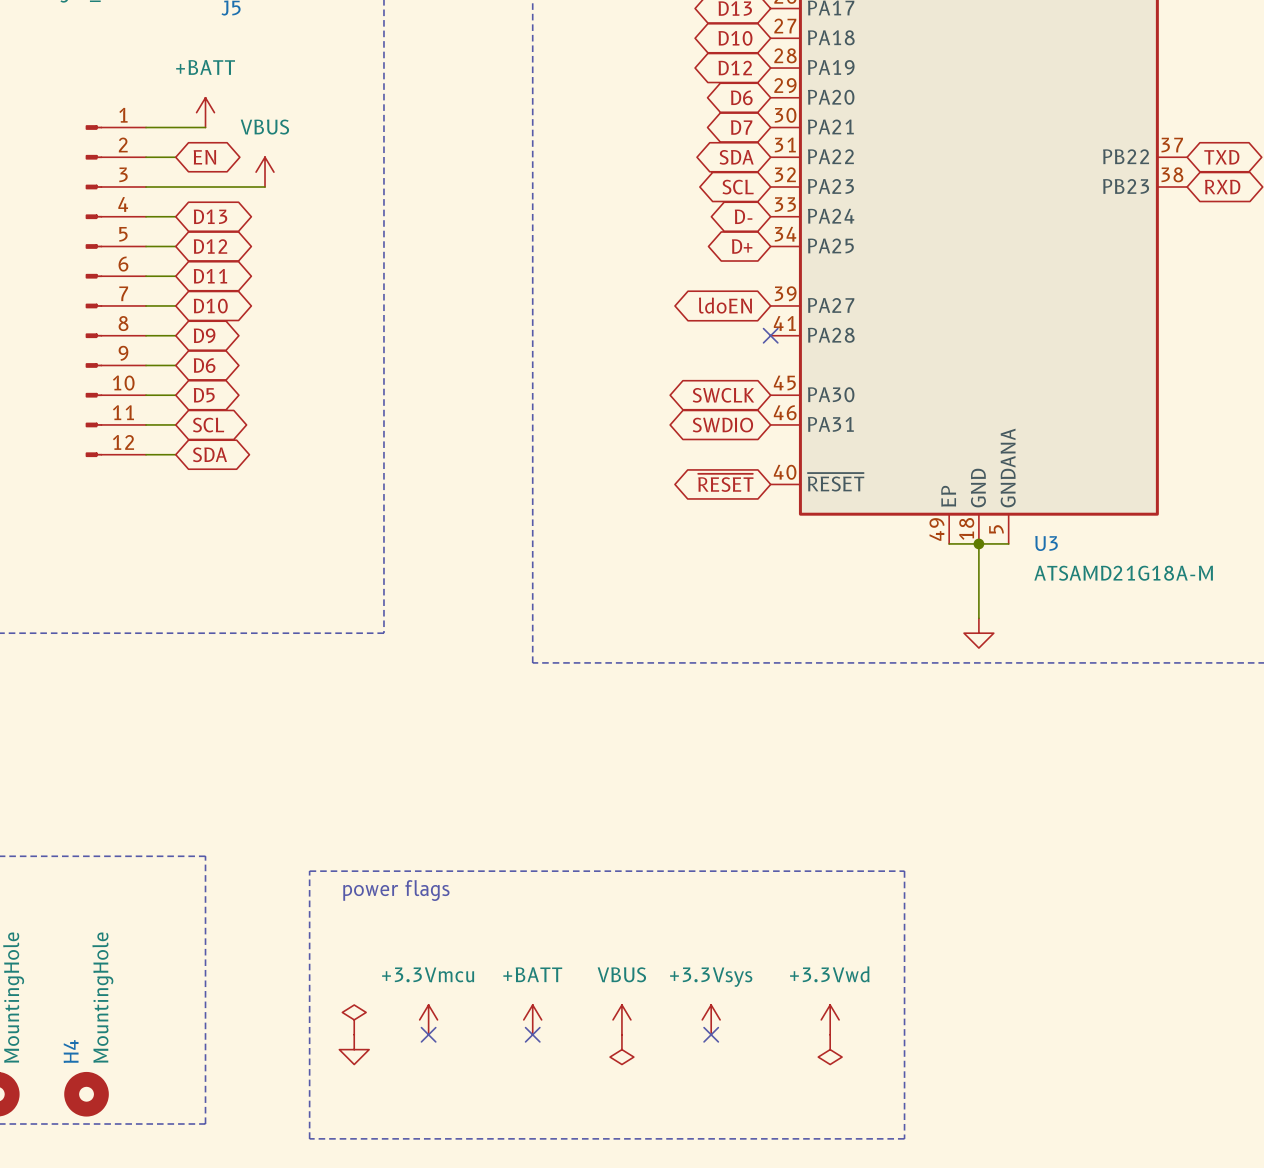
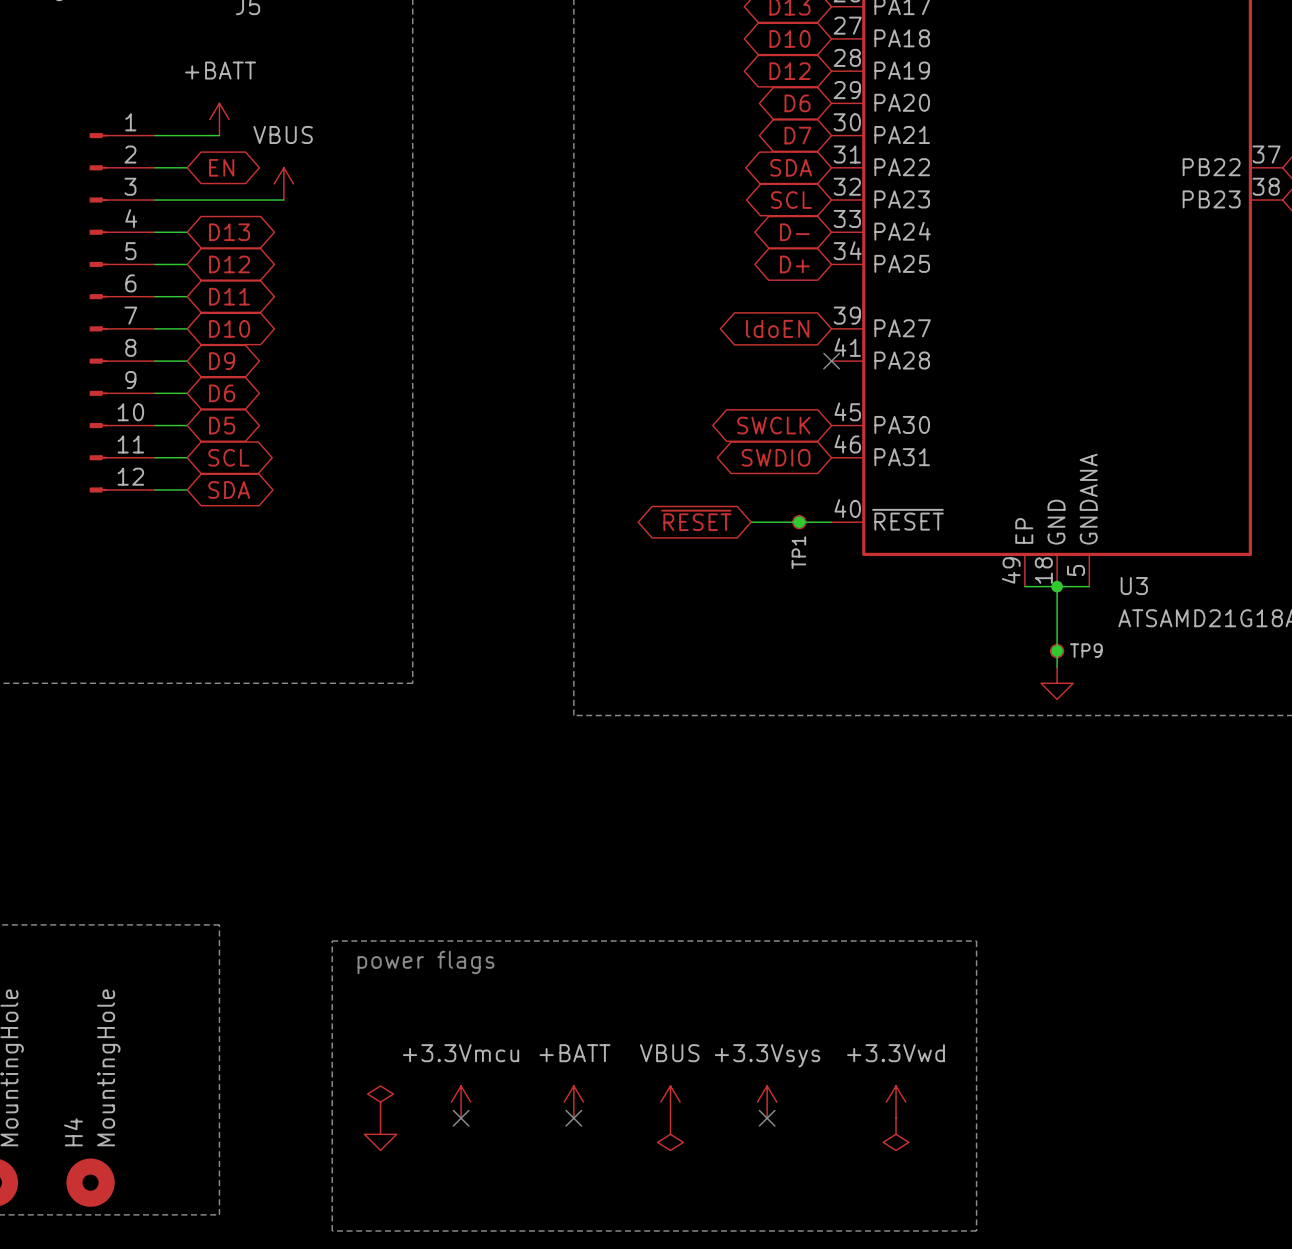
global label position: ~{RESET} (725, 482) -> ~{RESET} (696, 520)
wire: none -> (751, 522) (831, 522)
junction: none -> (799, 522)
TP1: none -> (799, 522)
junction: none -> (1057, 651)
TP9: none -> (1057, 651)

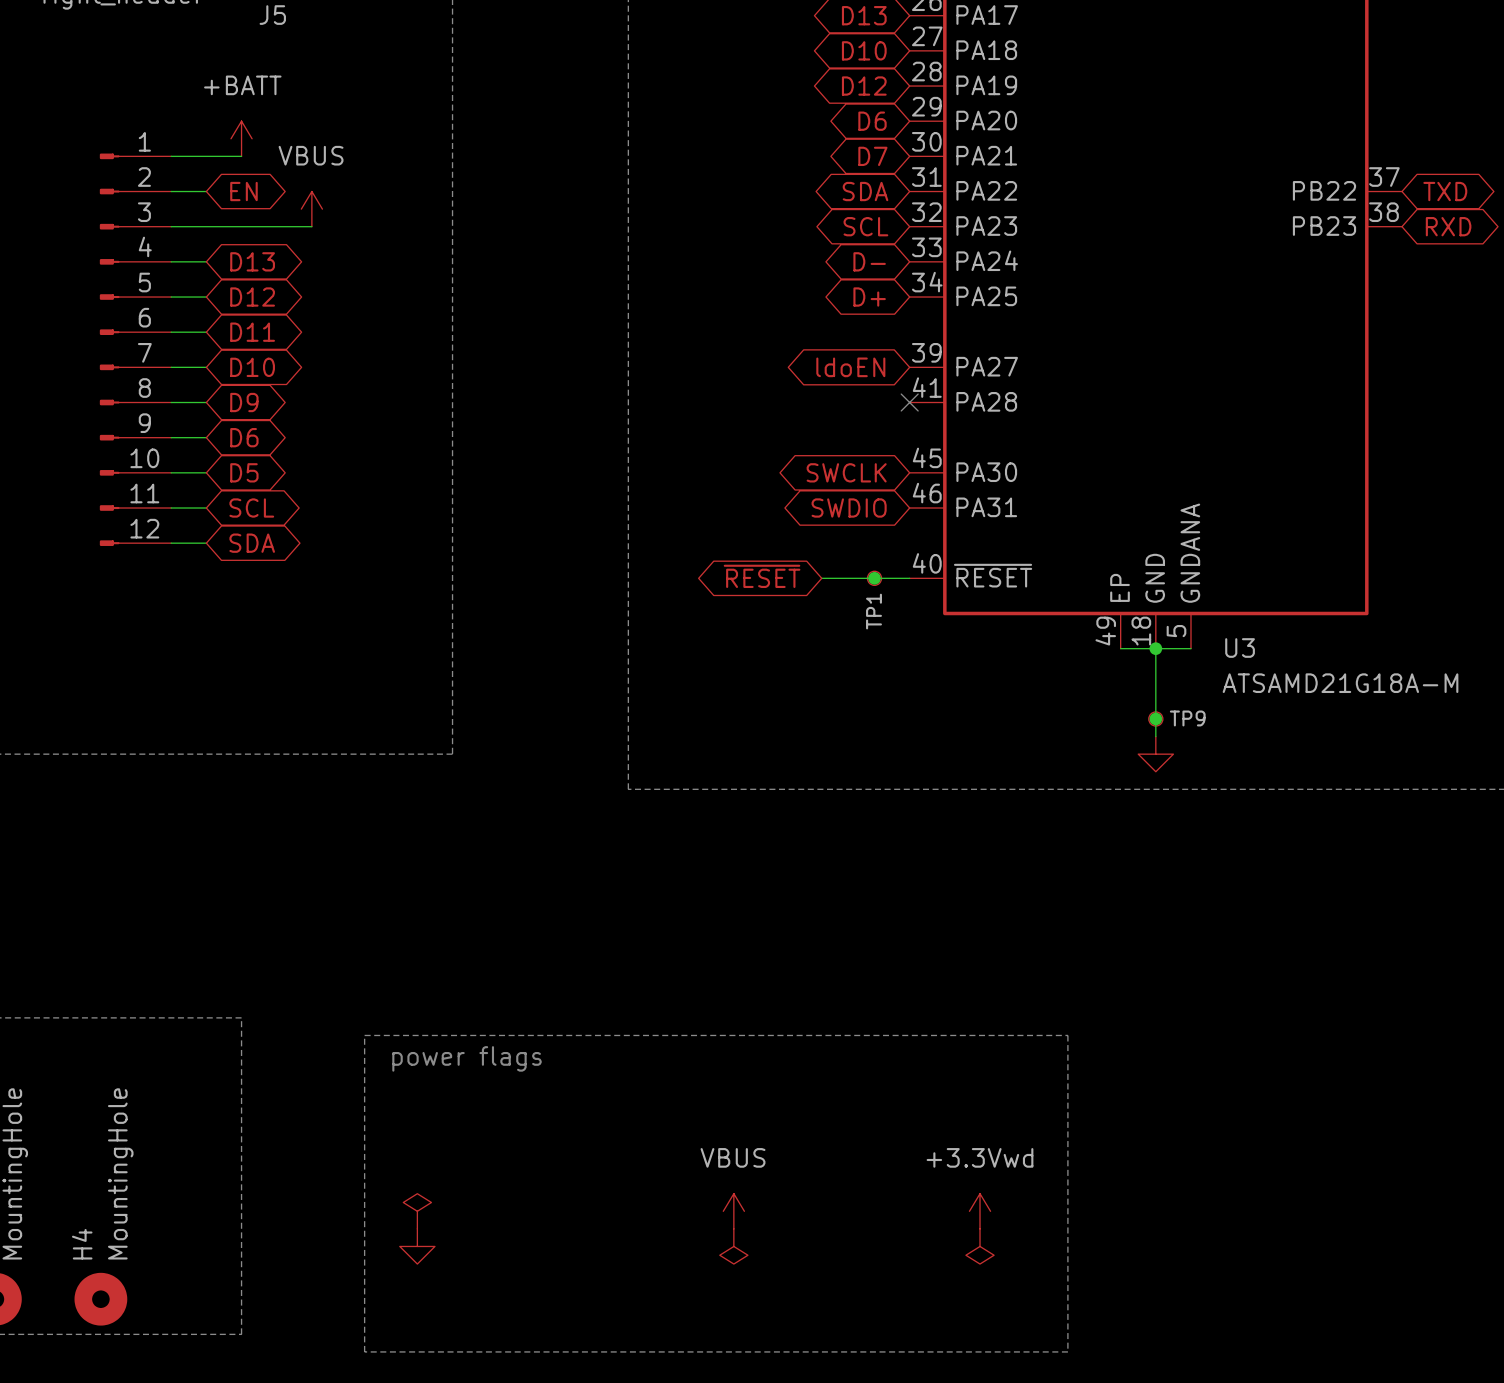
power symbol: +3.3Vmcu (461, 1102) -> none
power symbol: +BATT (573, 1102) -> none
power symbol: +3.3Vsys (767, 1102) -> none
no-connect mark: (461, 1118) -> none
no-connect mark: (573, 1118) -> none
no-connect mark: (767, 1118) -> none

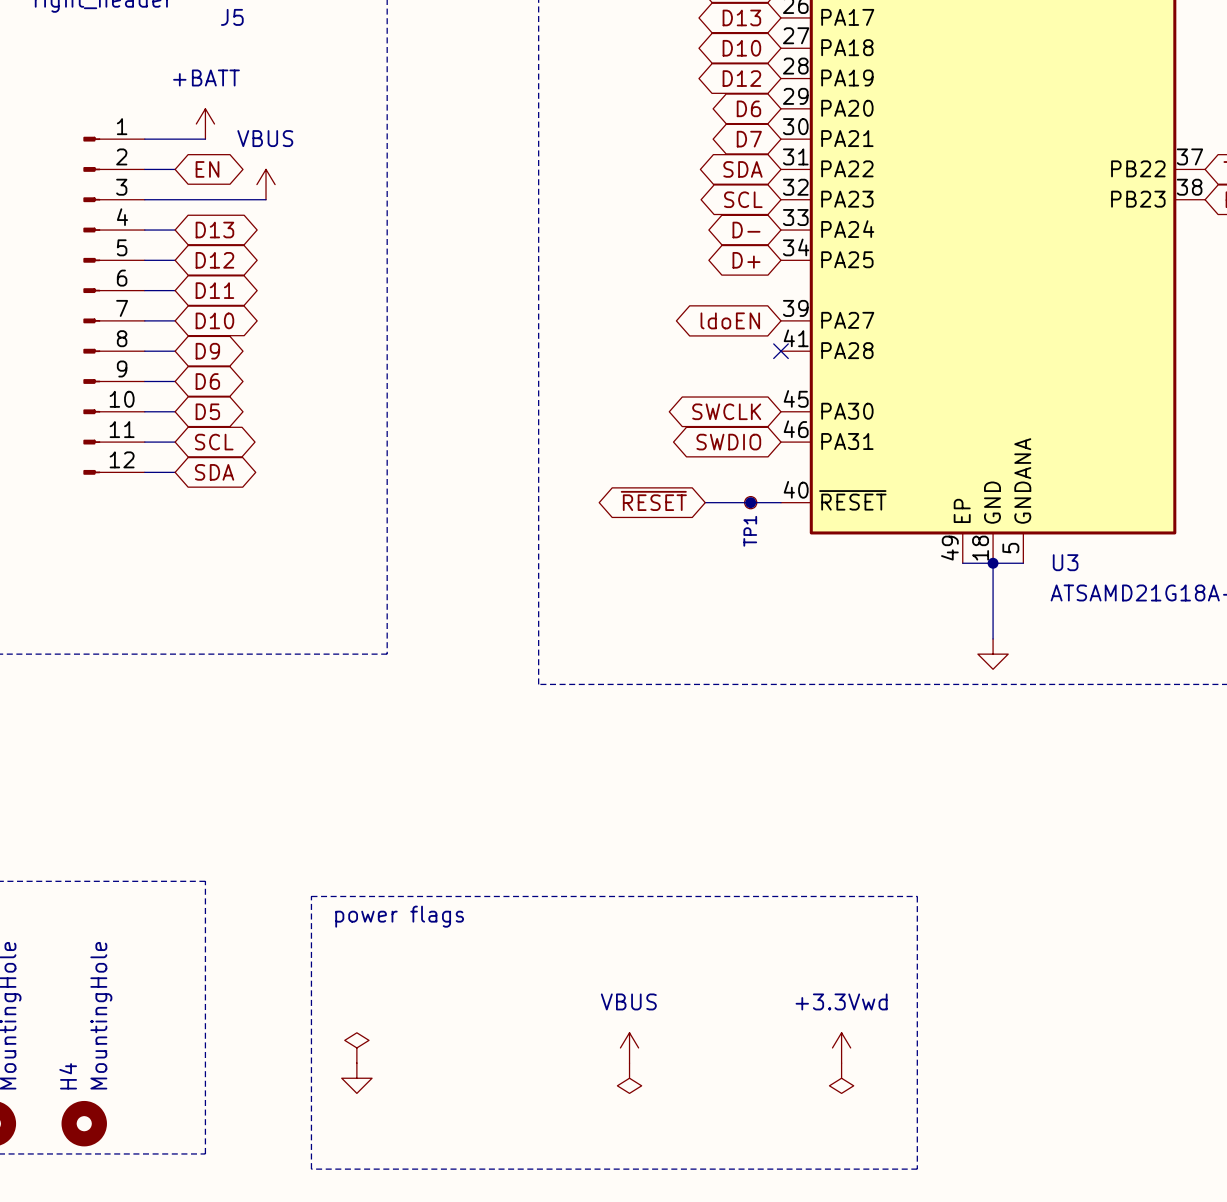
junction: (1155, 718) -> none
TP9: (1155, 718) -> none

